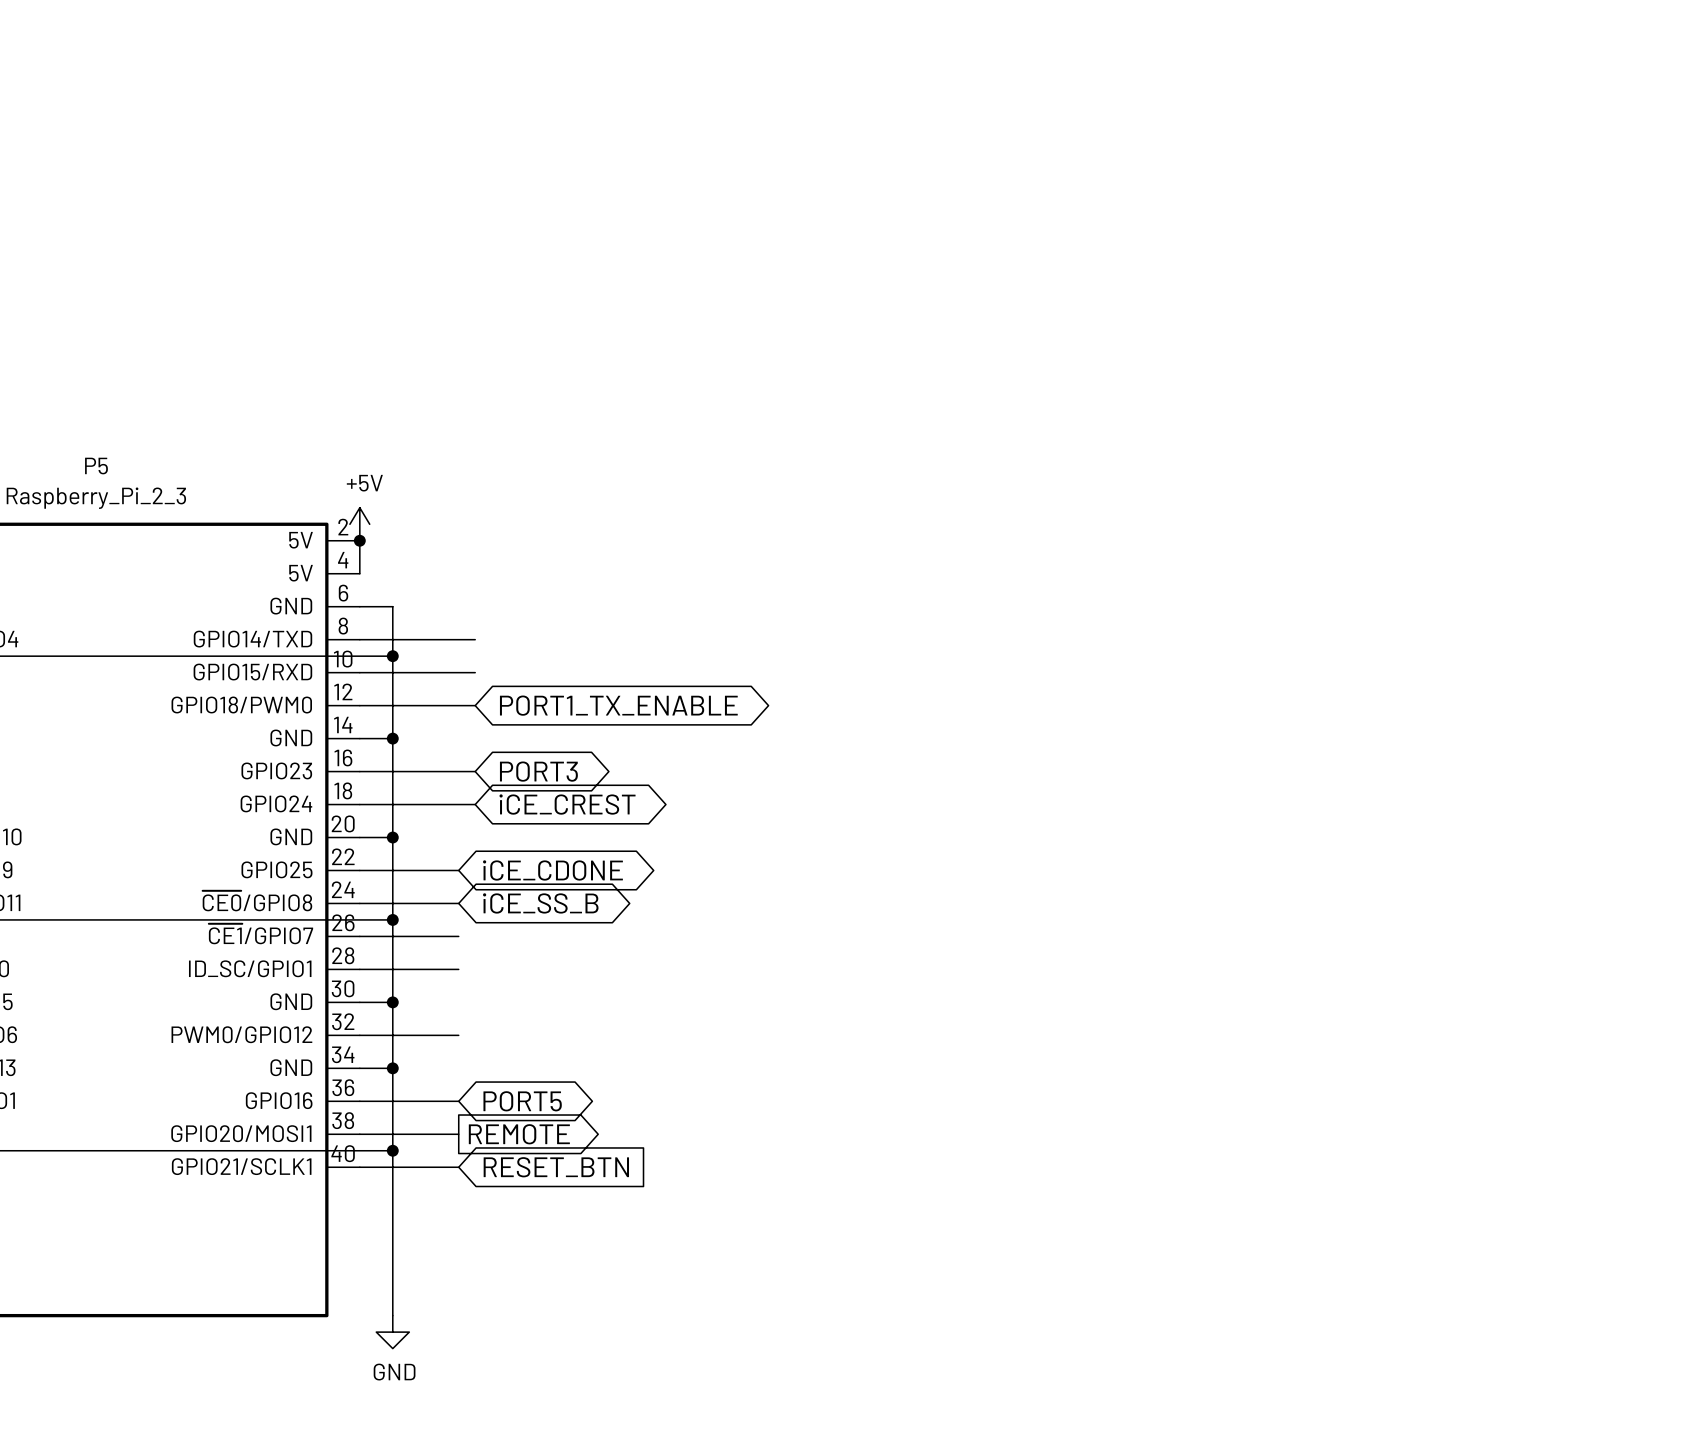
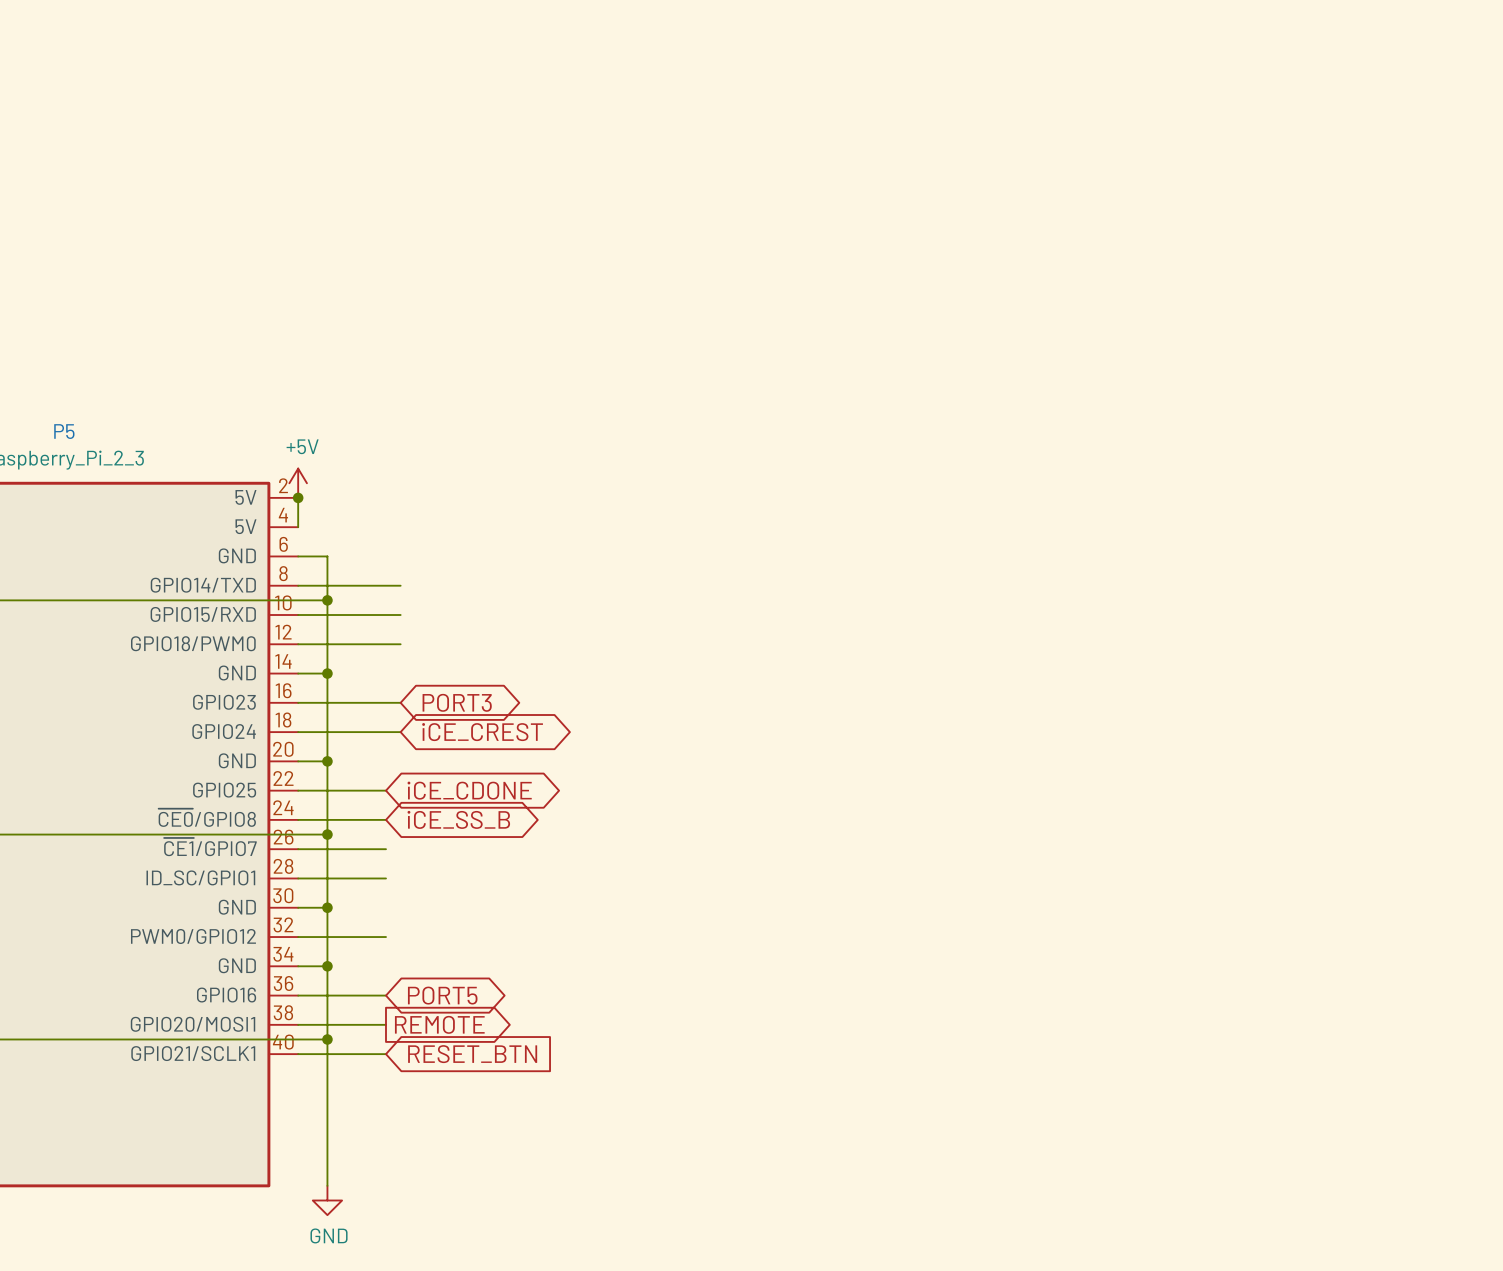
global label: PORT1_TX_ENABLE (618, 705) -> none

